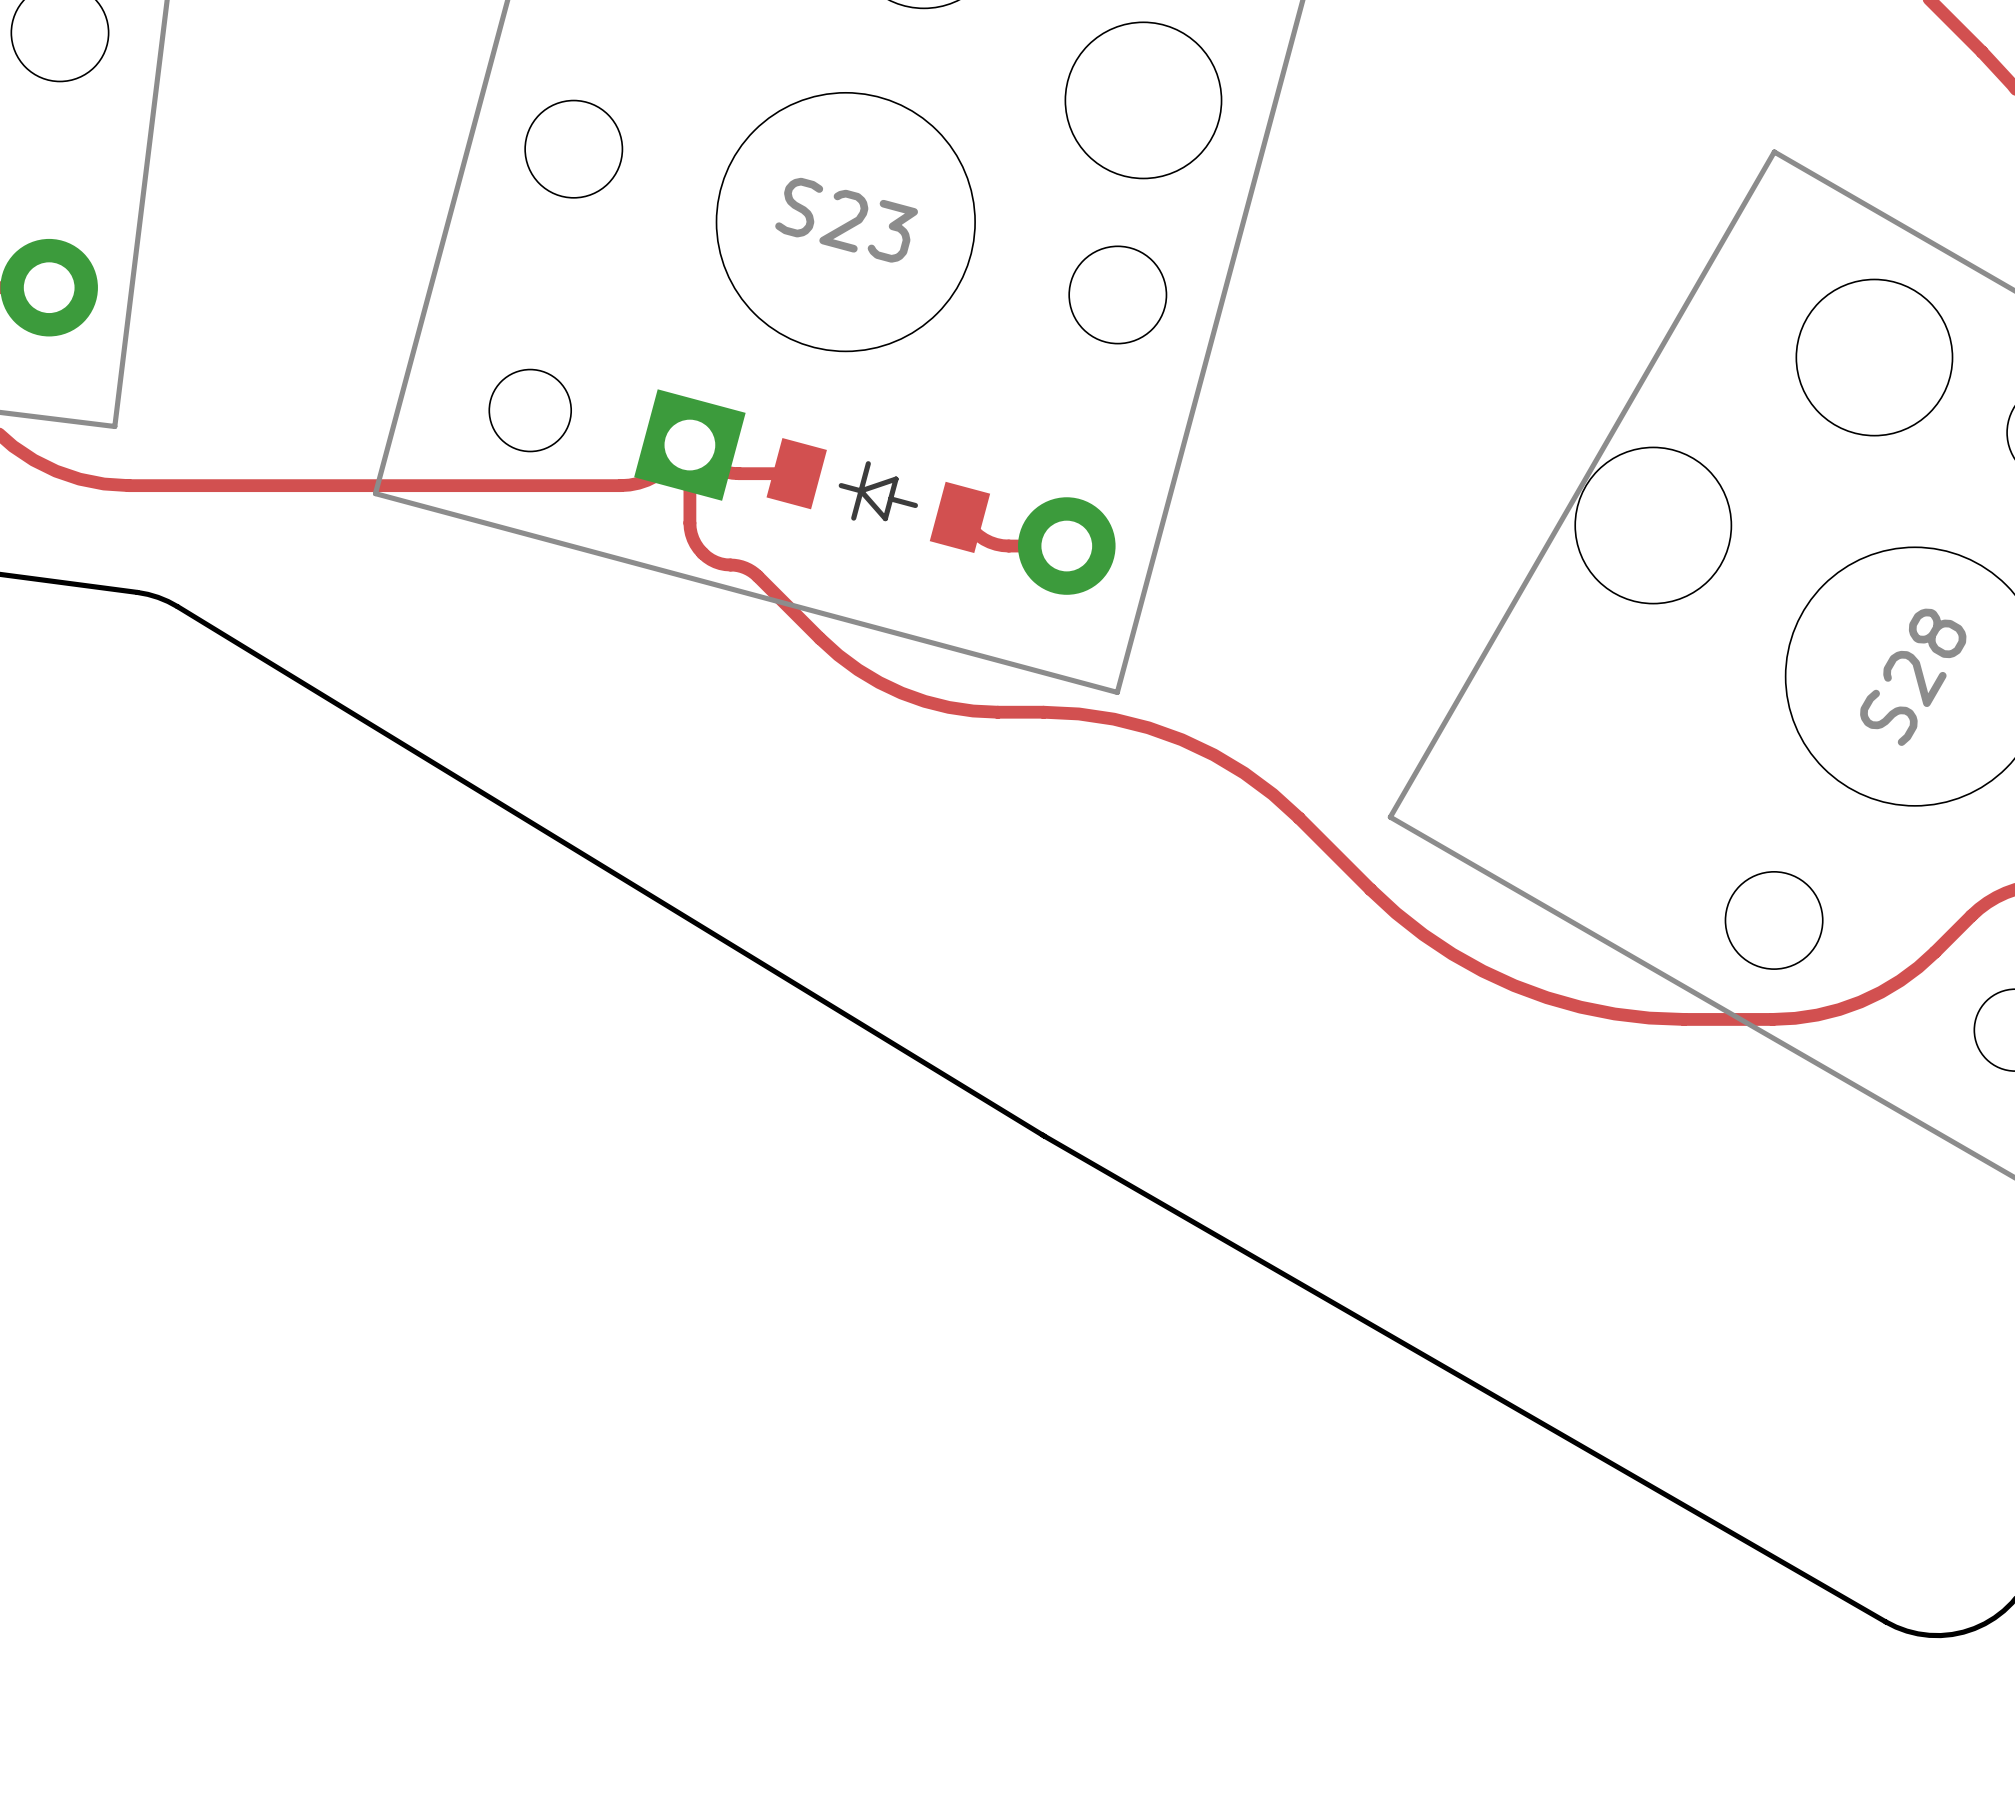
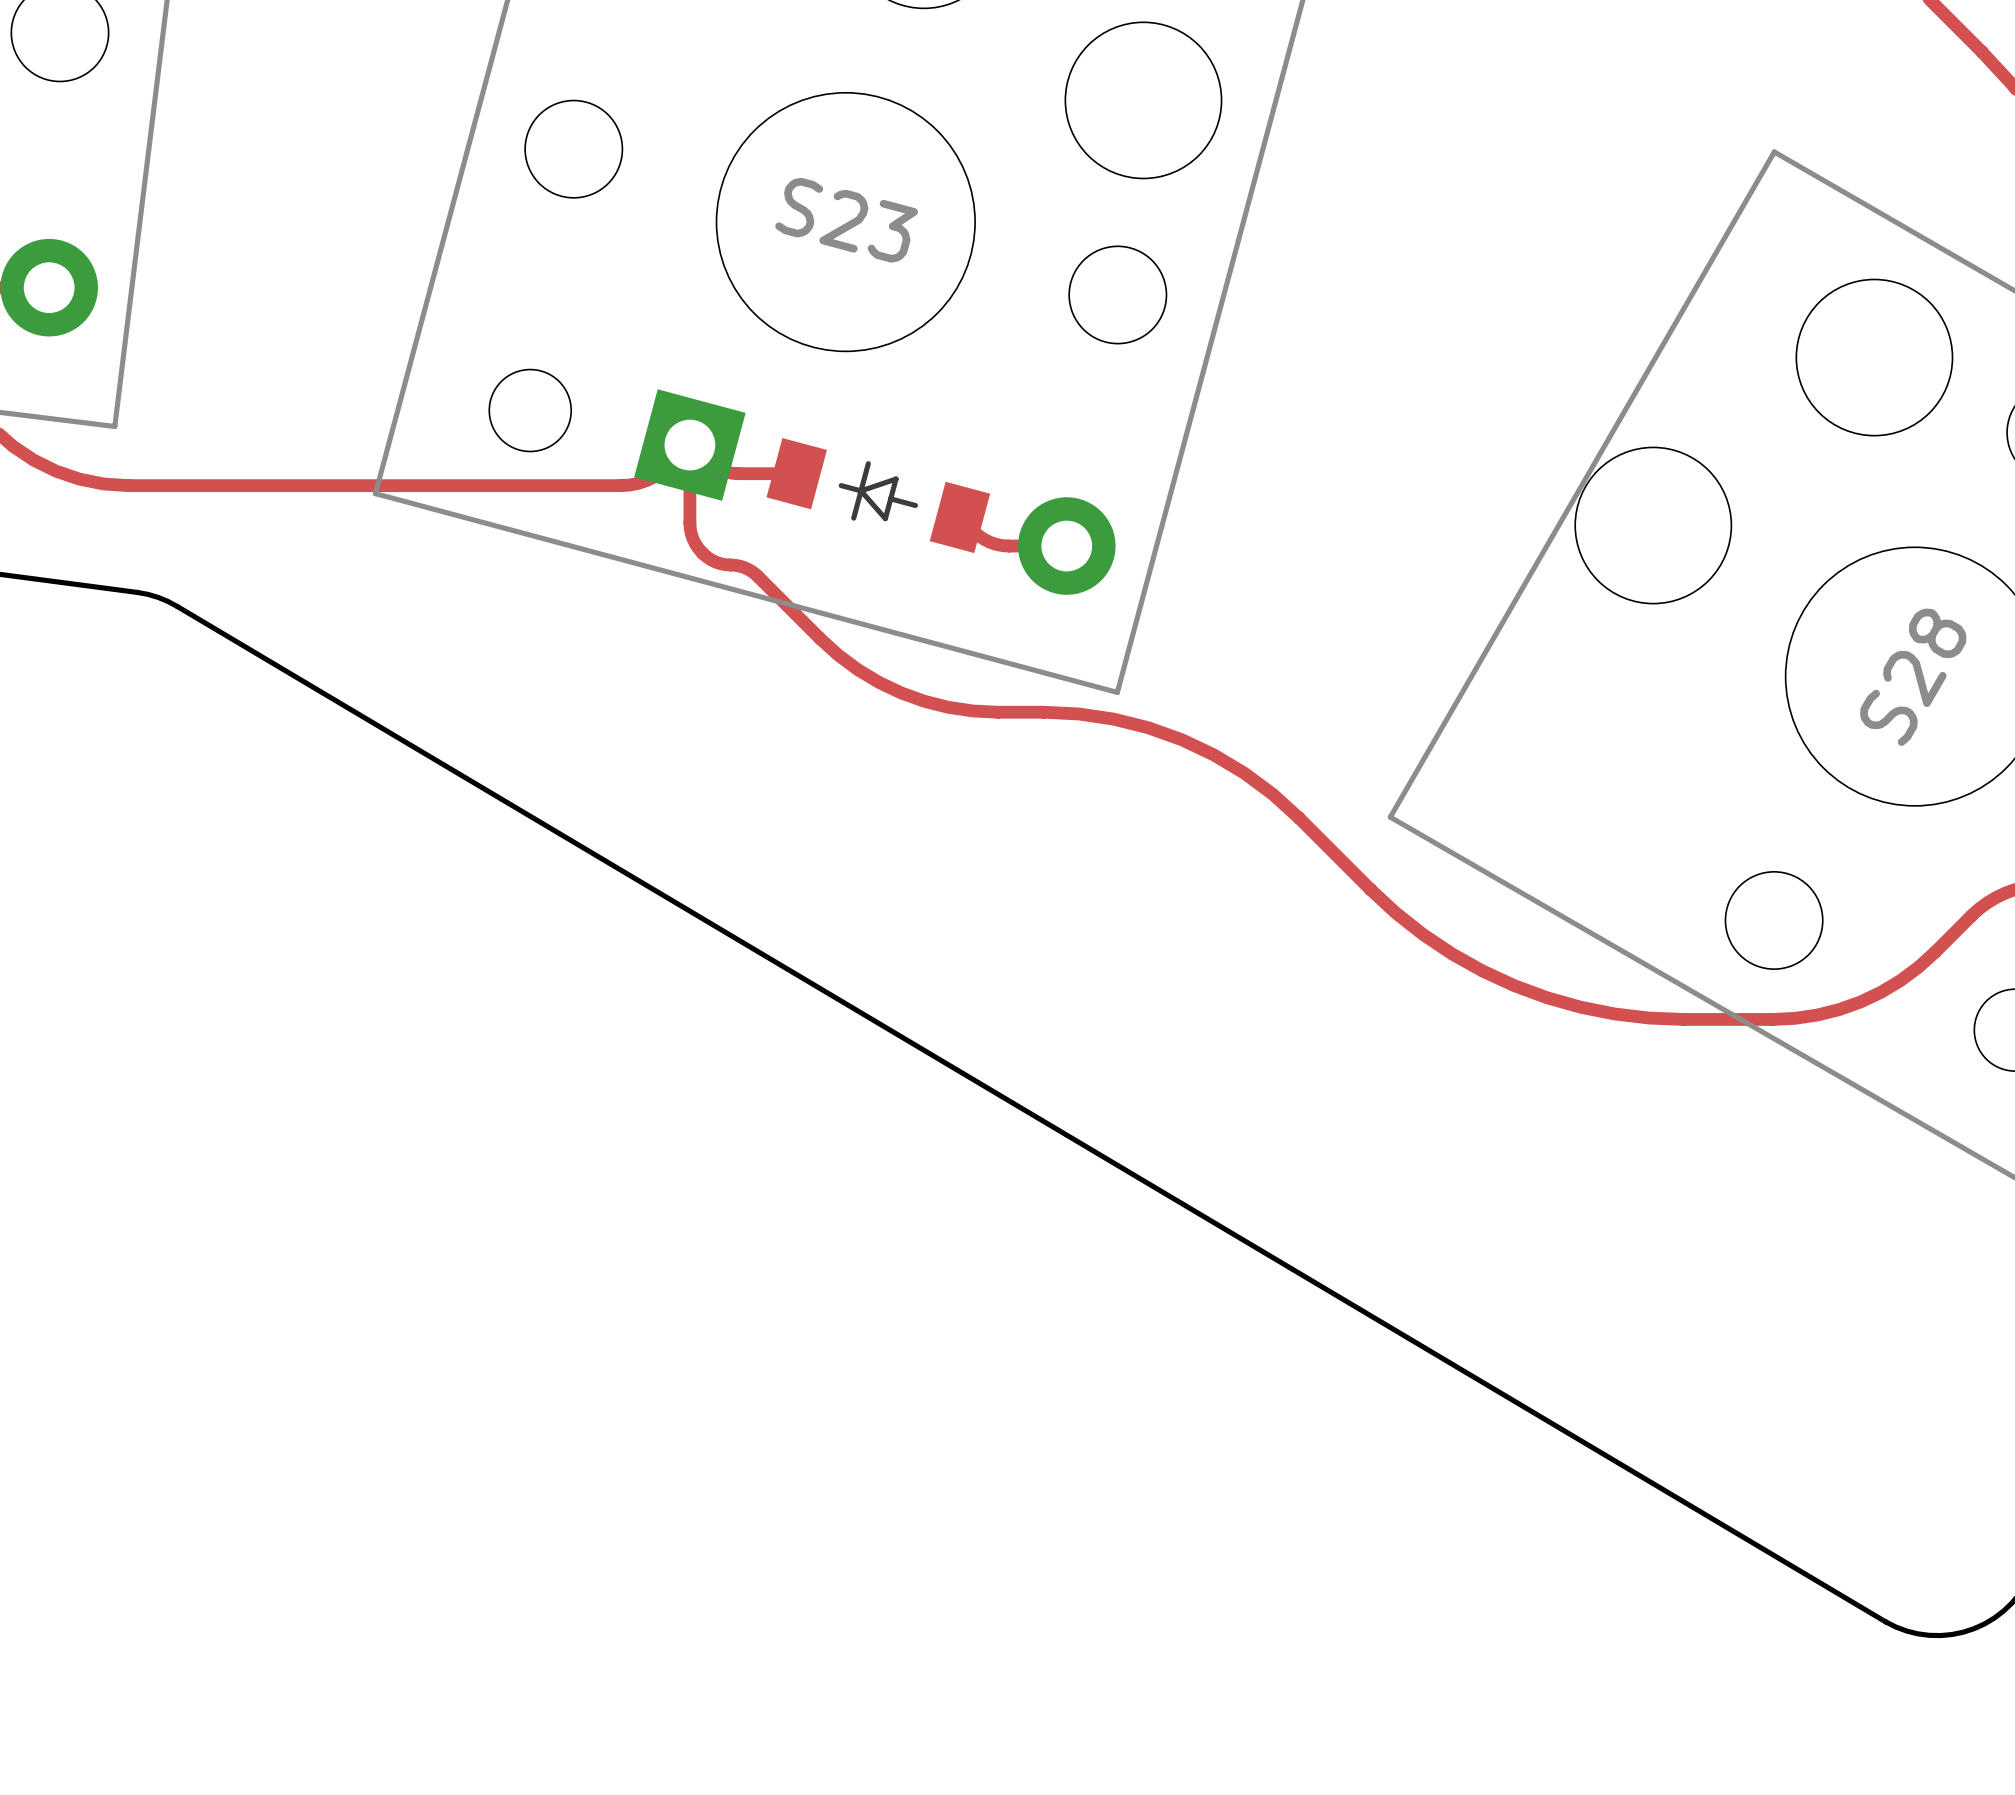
board edge: (177, 606) (1043, 1135) (1885, 1621) -> (177, 606) (1885, 1621)

